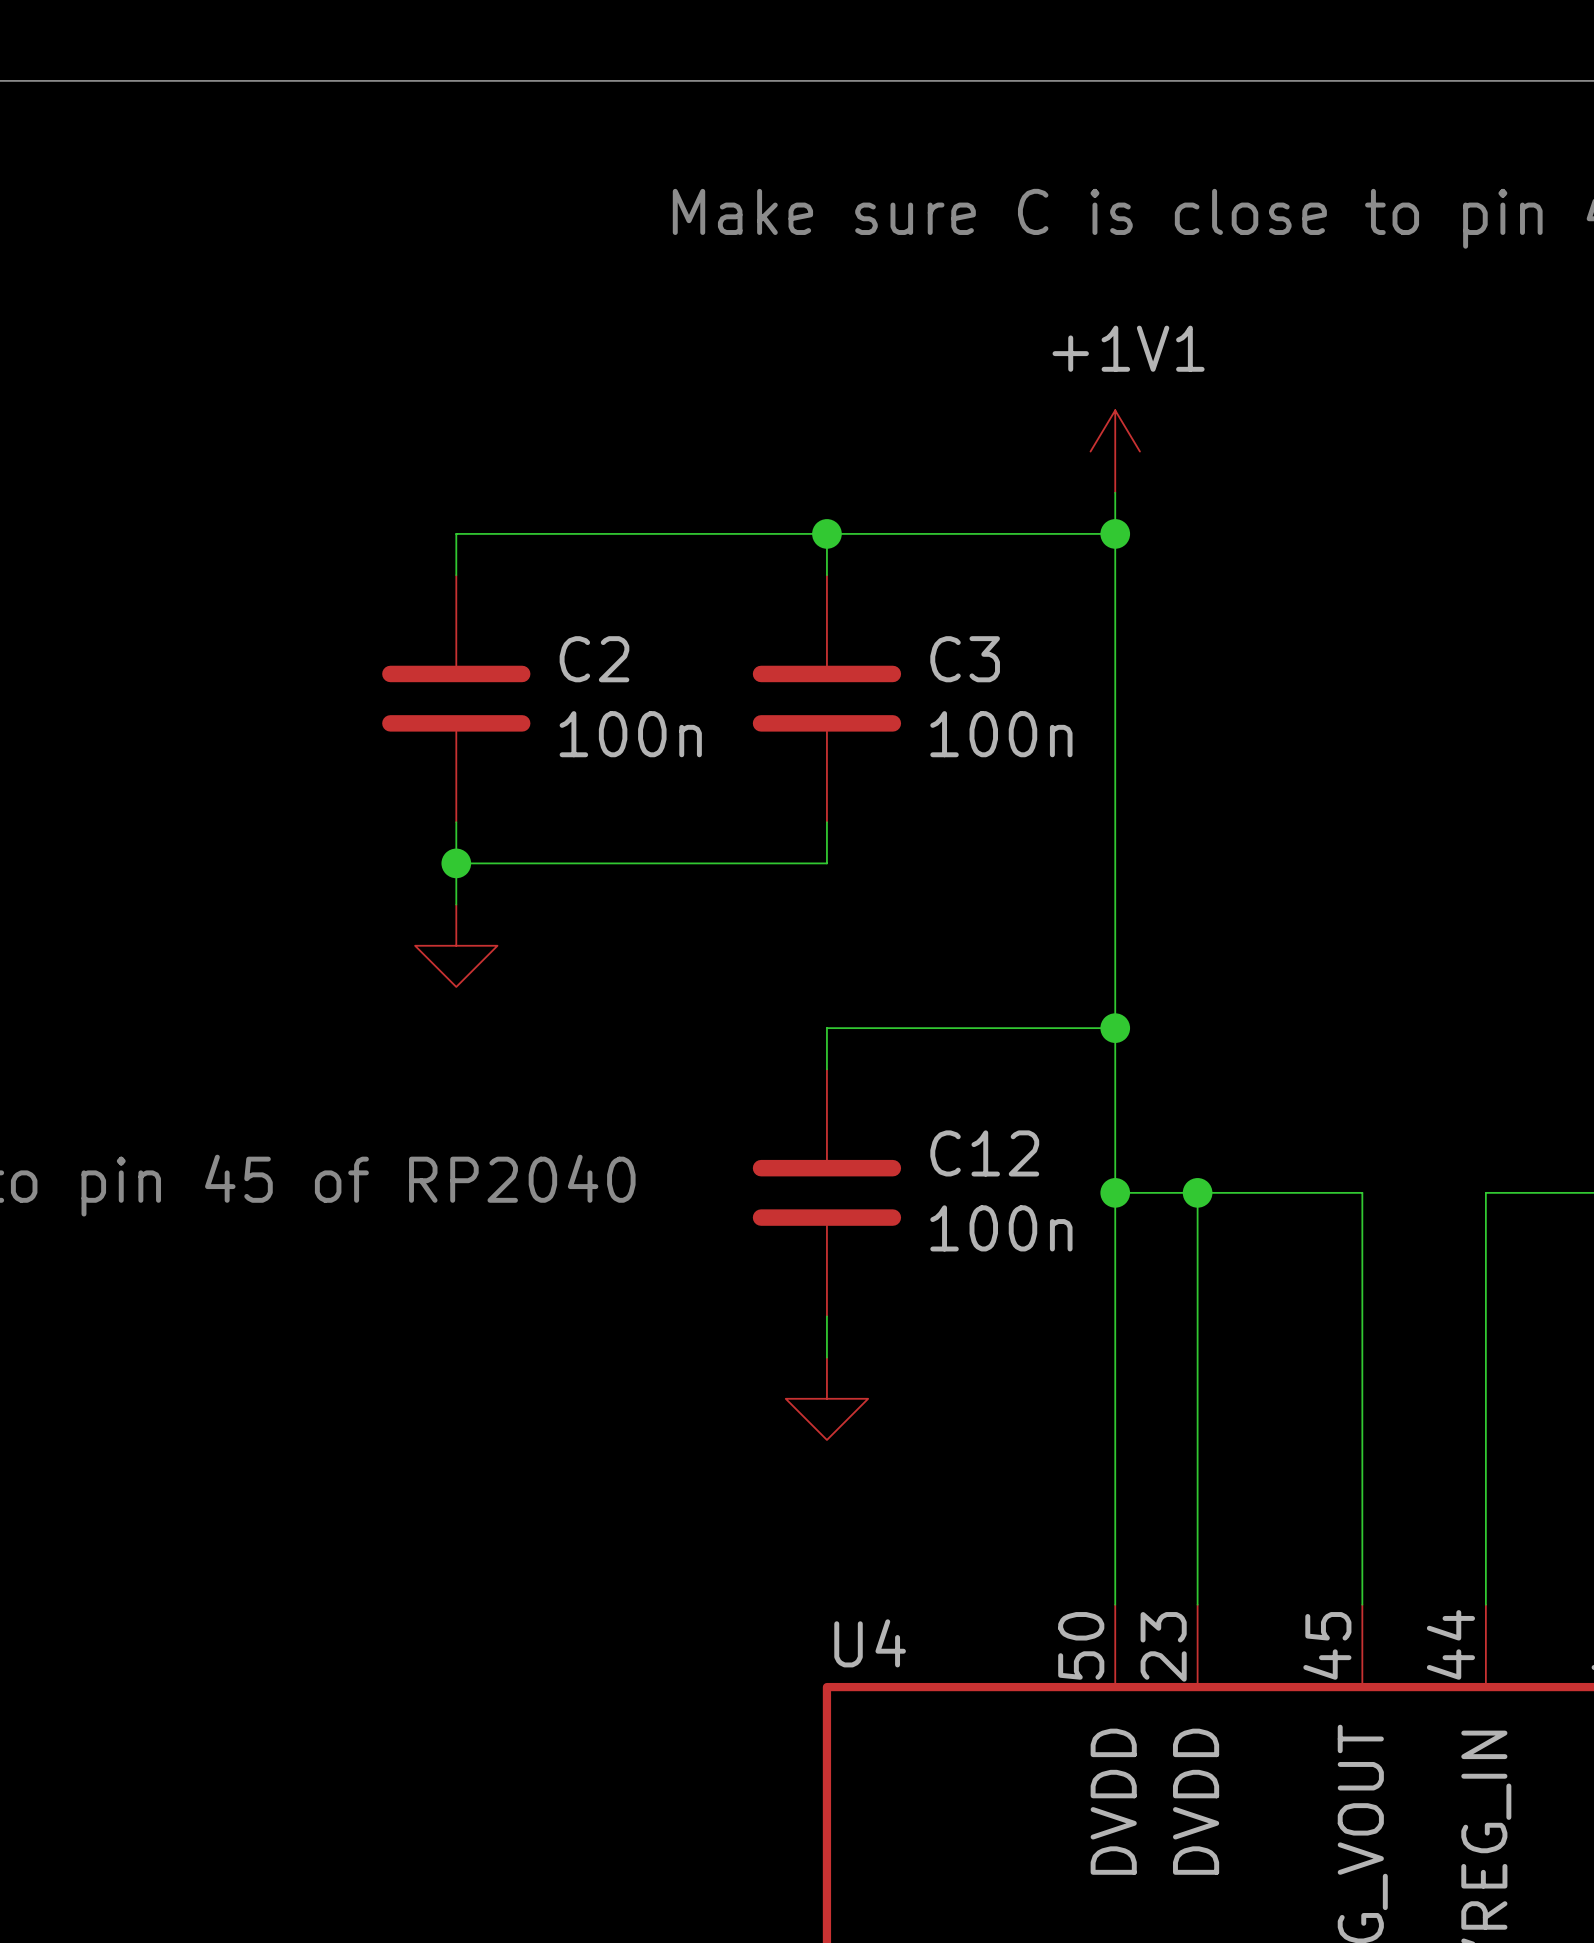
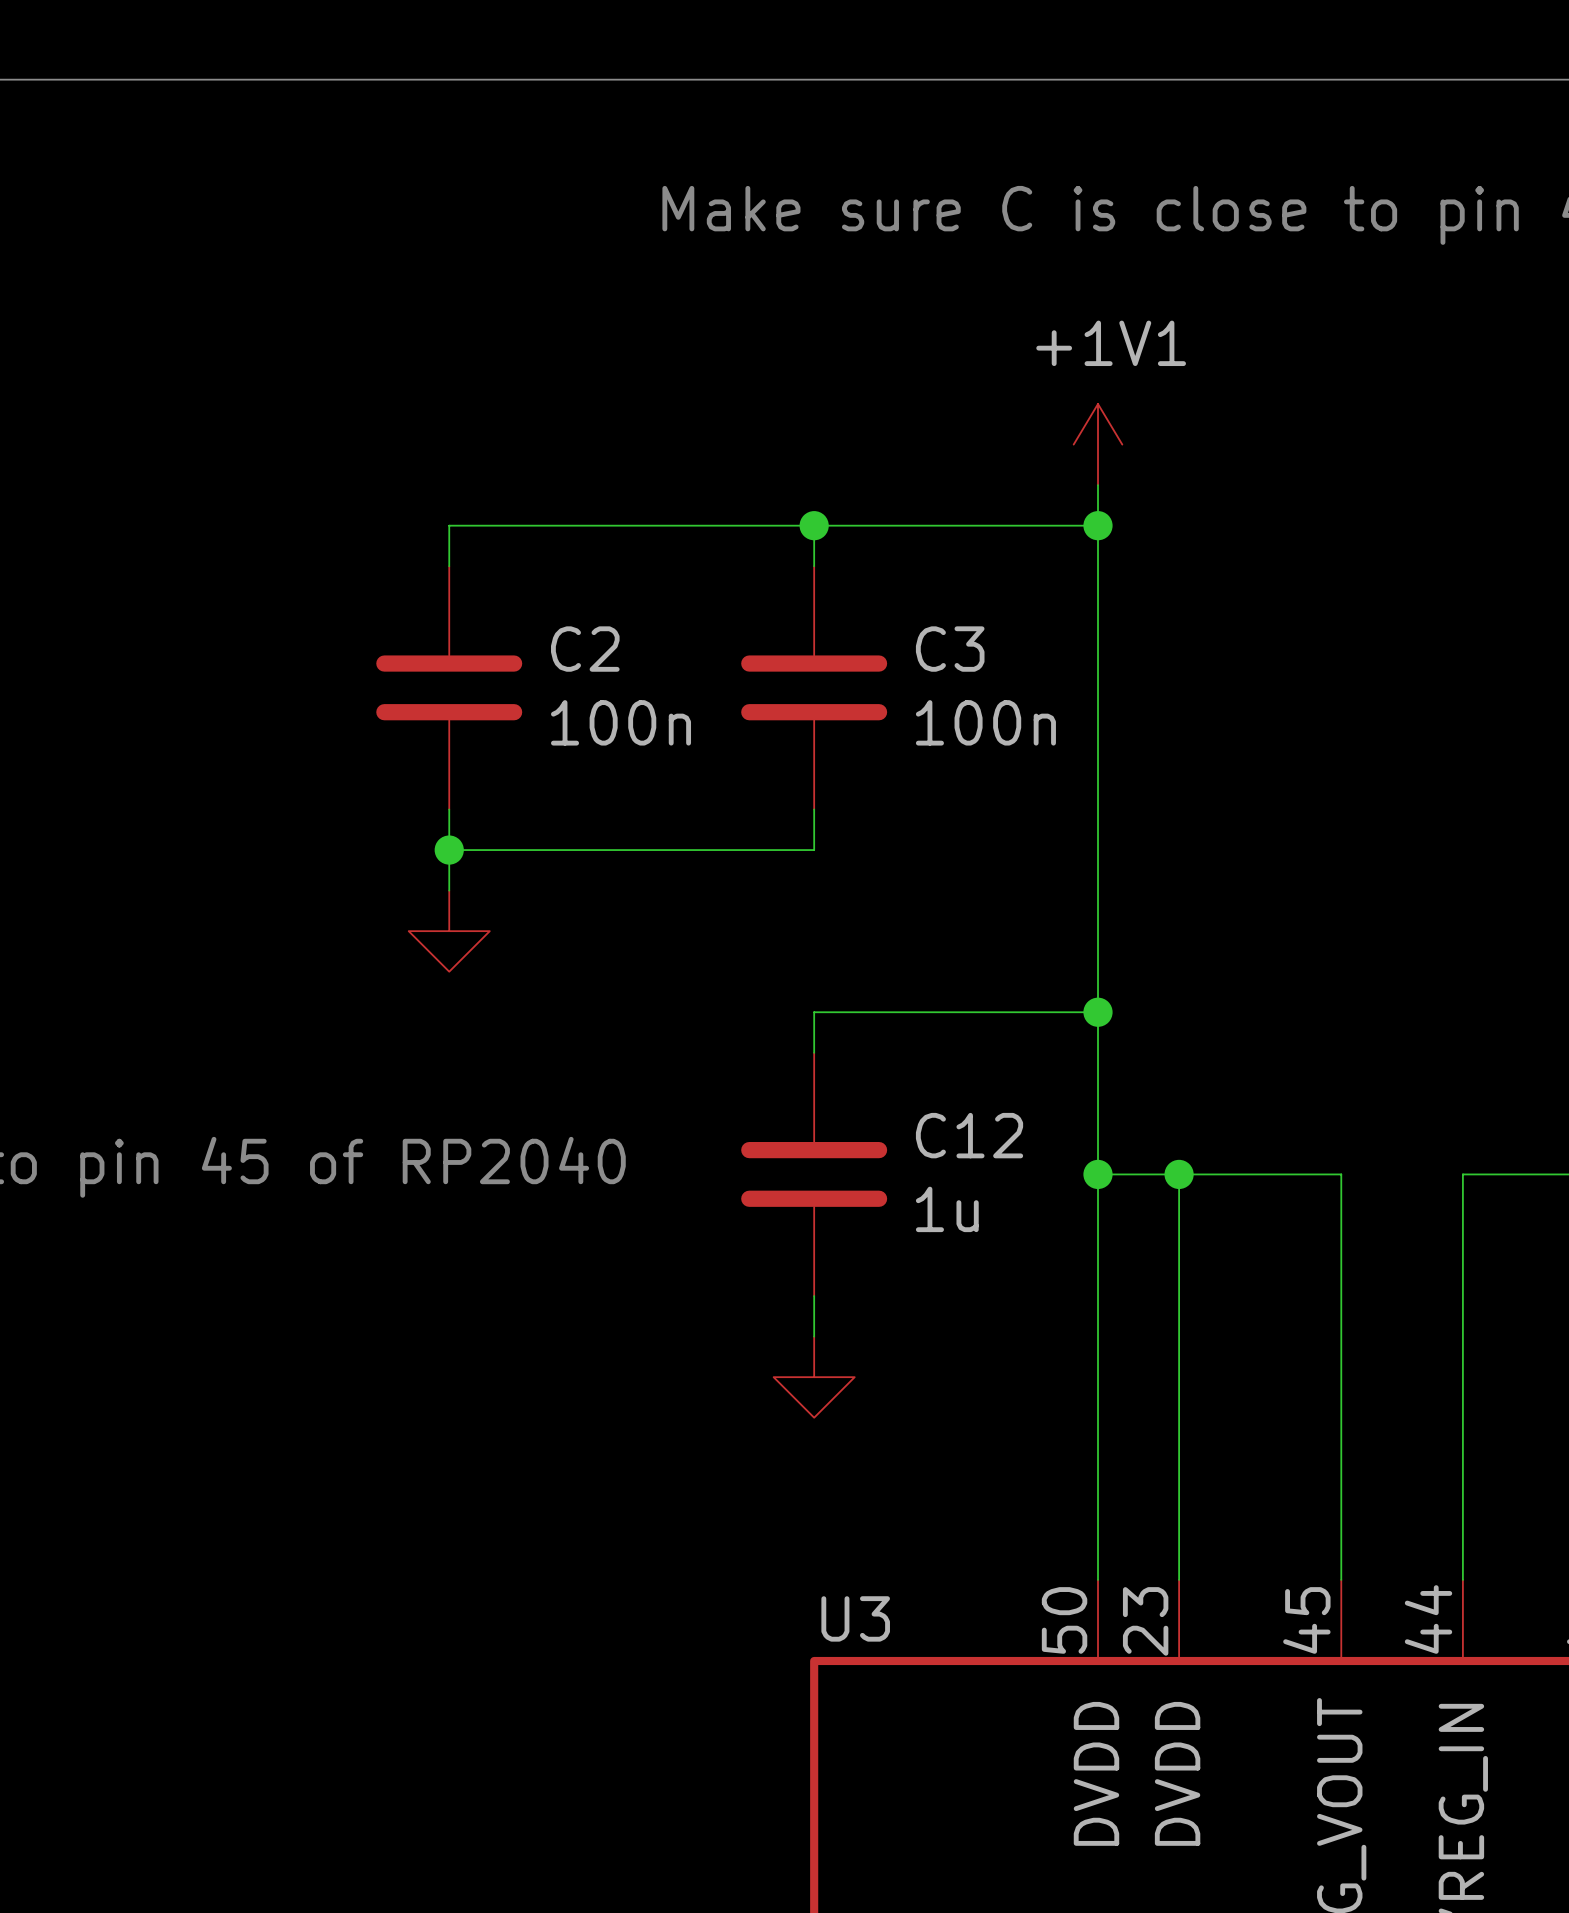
C12 value: 100n (1001, 1228) -> 1u (947, 1209)
U4 name: U4 (870, 1643) -> U3 (855, 1618)

